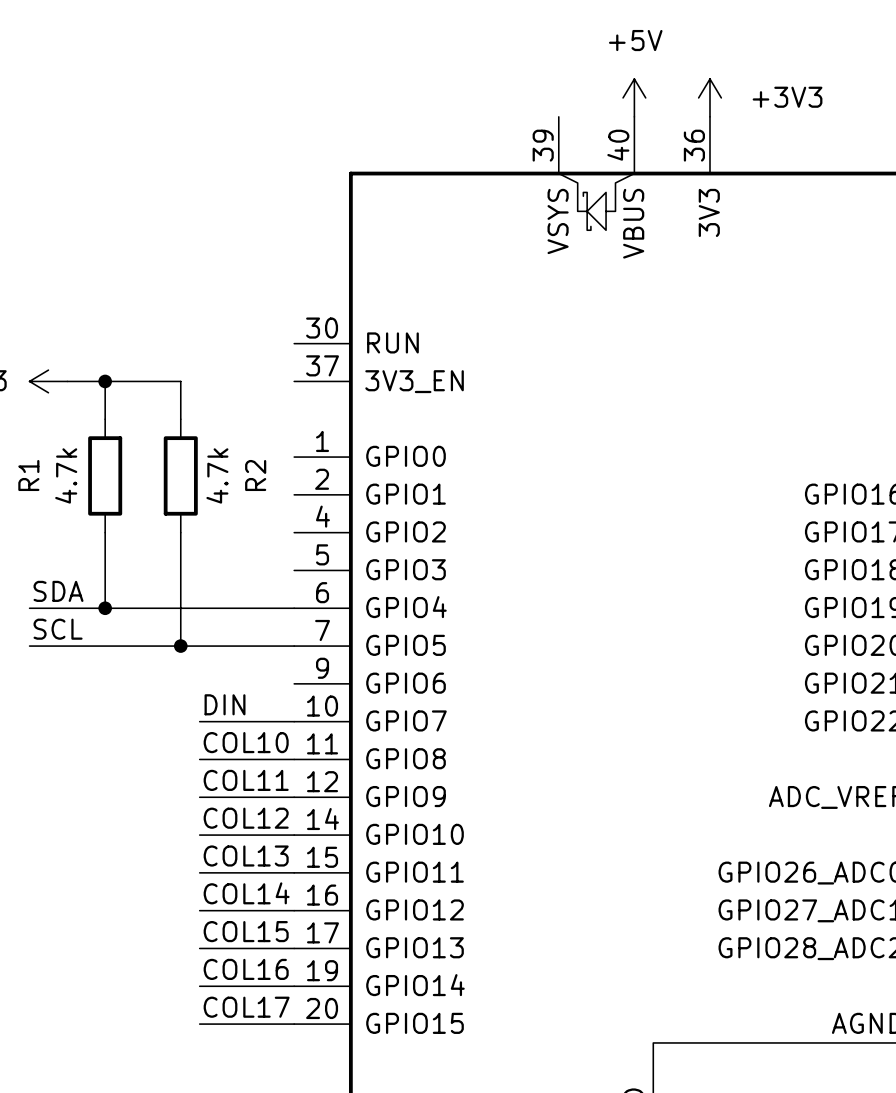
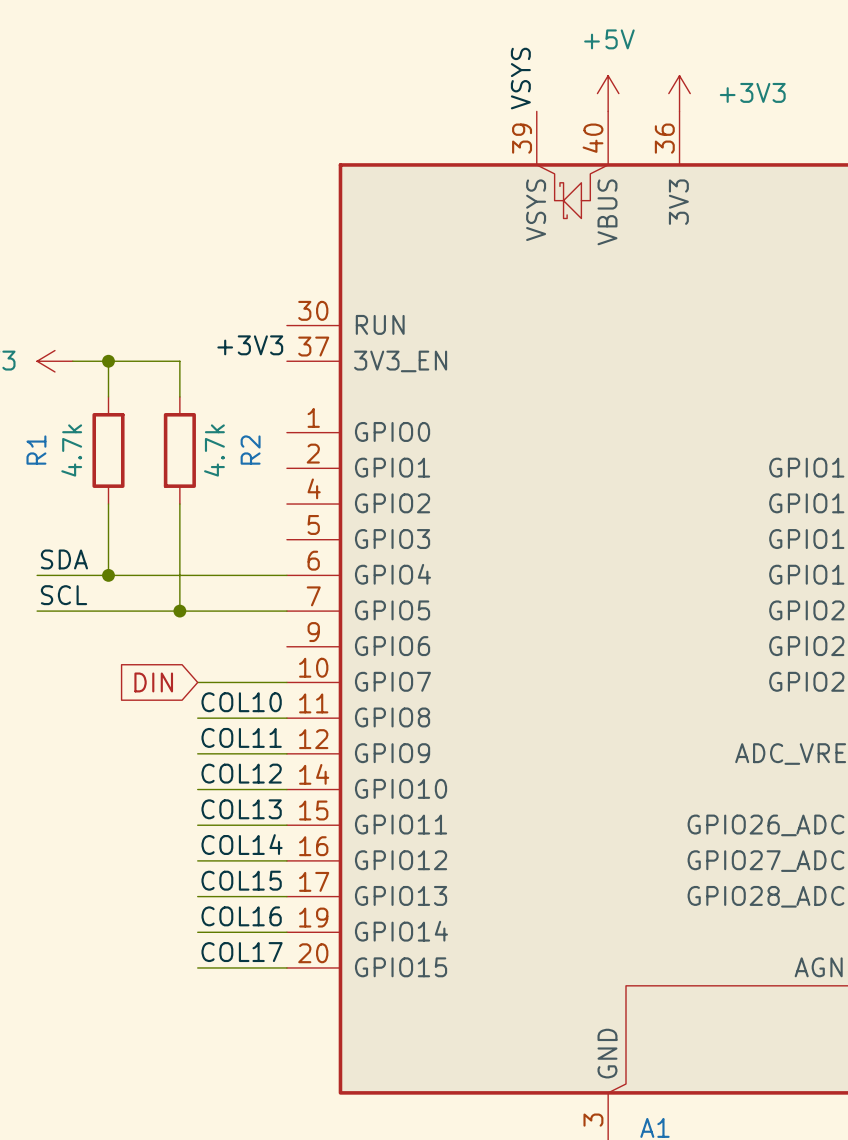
label: none -> VSYS (520, 78)
label: none -> +3V3 (250, 345)
label: DIN (225, 704) -> none
global label: none -> DIN (153, 682)

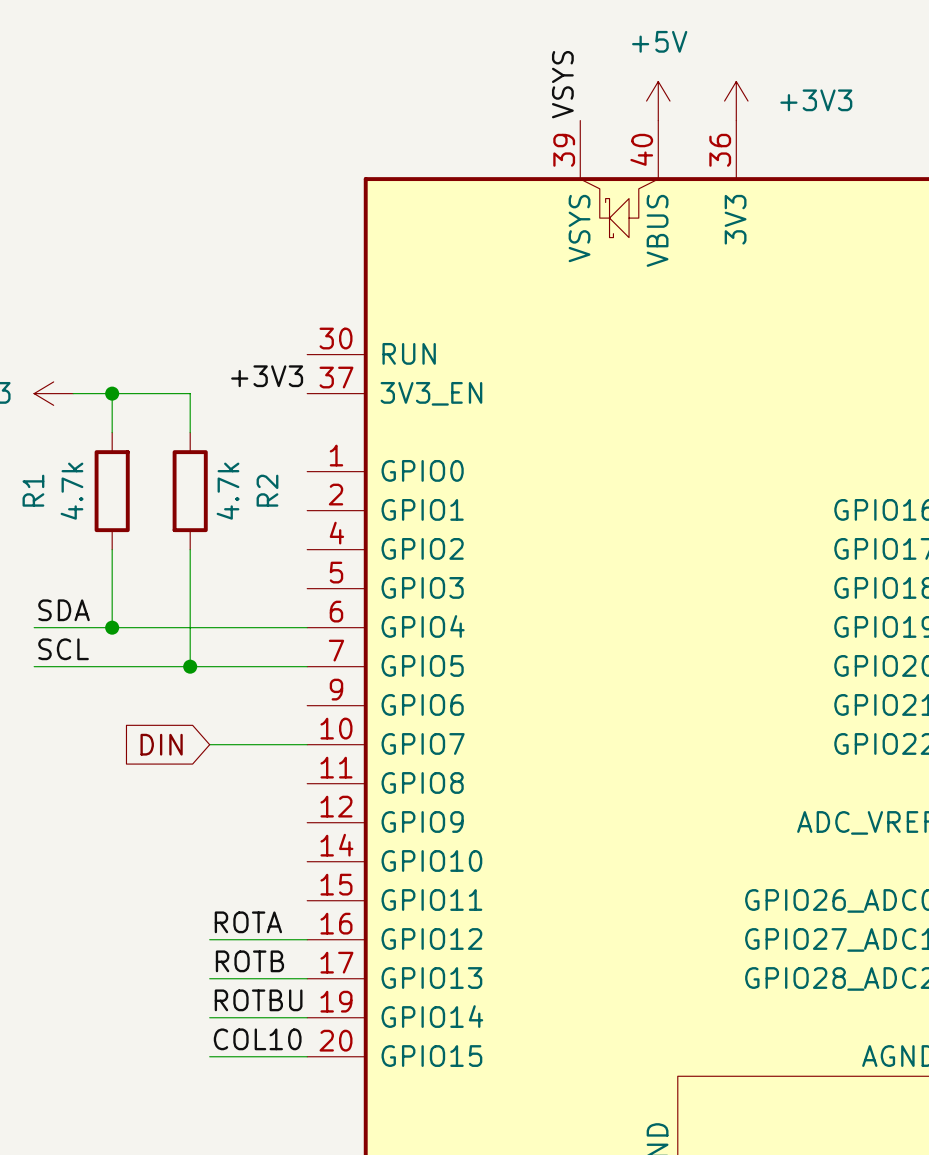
label: COL10 (241, 702) -> none
wire: (197, 718) (286, 718) -> none
label: COL11 (241, 737) -> none
wire: (197, 753) (286, 753) -> none
label: COL12 (241, 773) -> none
wire: (197, 789) (286, 789) -> none
label: COL13 (241, 809) -> none
wire: (197, 825) (286, 825) -> none
label: COL14 (242, 844) -> ROTA (248, 922)
label: COL15 (241, 880) -> ROTB (249, 961)
label: COL16 (241, 916) -> ROTBU (258, 1000)
label: COL17 (242, 952) -> COL10 (257, 1039)

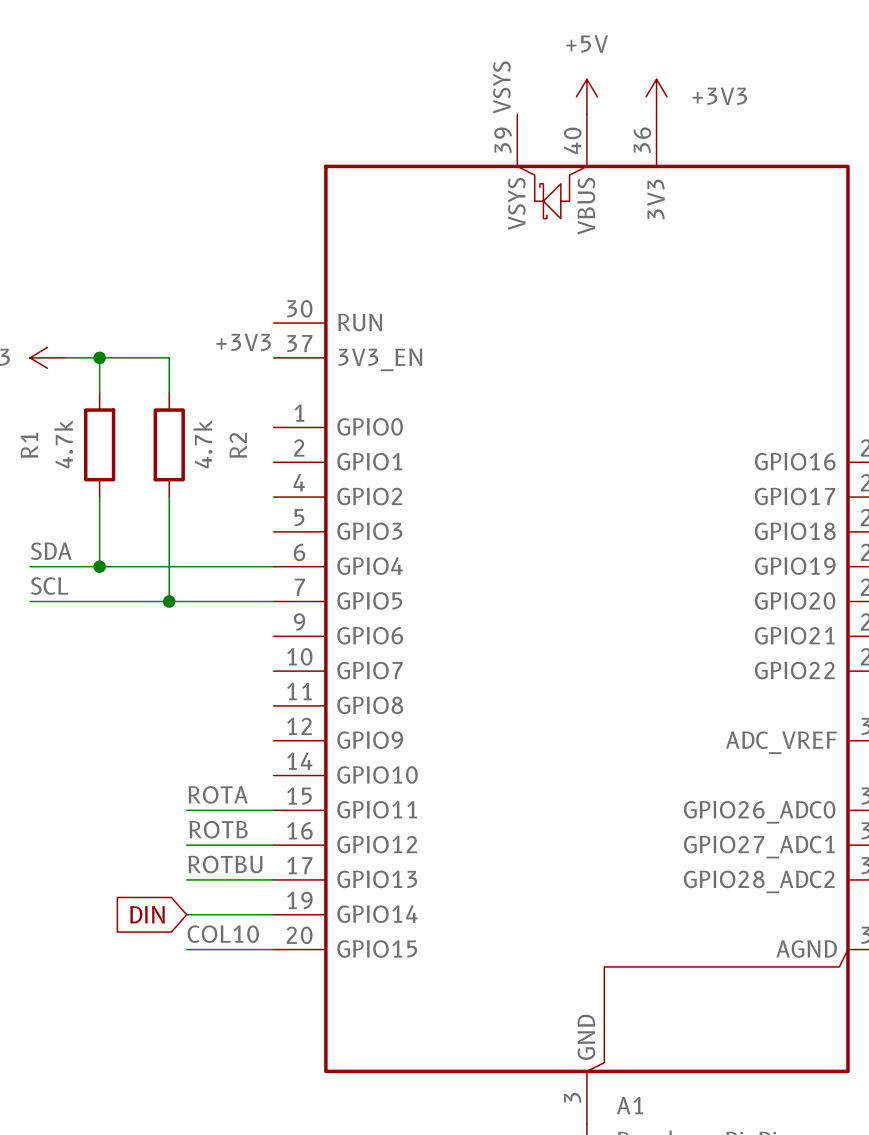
global label position: DIN (161, 744) -> DIN (147, 914)
wire: (209, 744) (307, 744) -> (186, 810) (273, 810)
label: none -> ROTA (218, 794)
label: ROTA (248, 922) -> ROTB (218, 829)
label: ROTB (249, 961) -> ROTBU (225, 864)
label: ROTBU (258, 1000) -> none

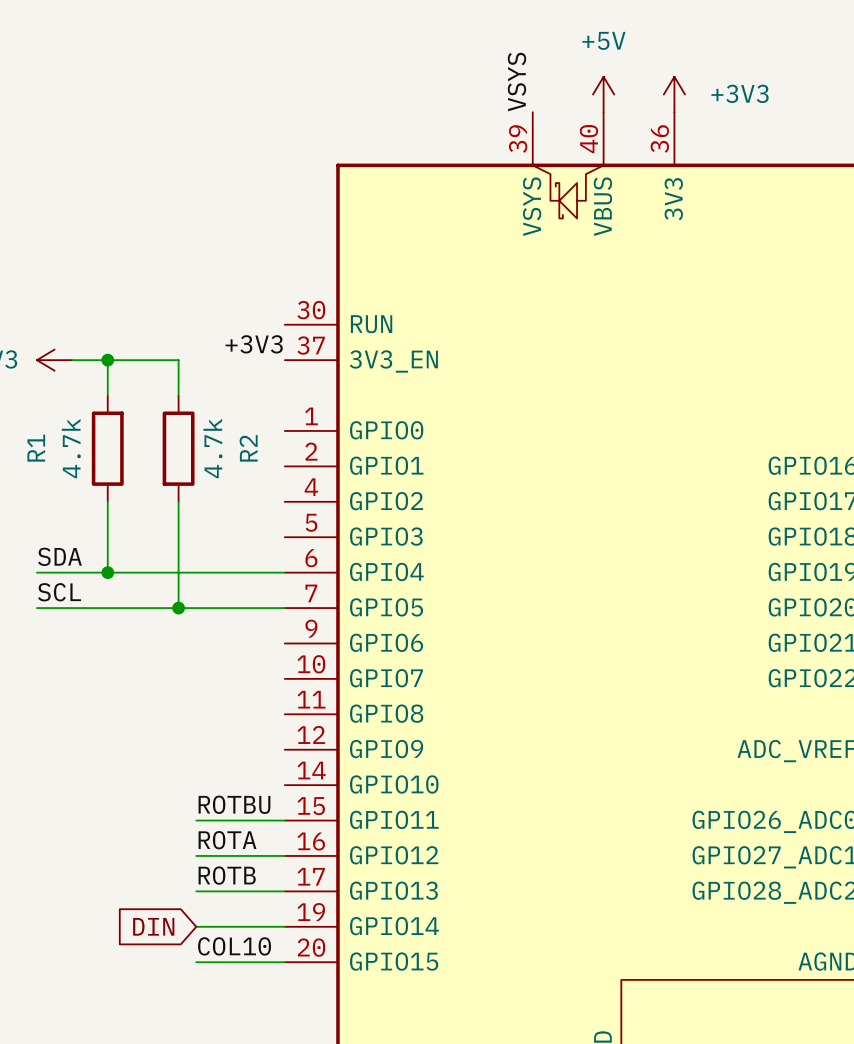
label: ROTA (218, 794) -> ROTBU (234, 804)
label: ROTB (218, 829) -> ROTA (227, 840)
label: ROTBU (225, 864) -> ROTB (227, 875)

